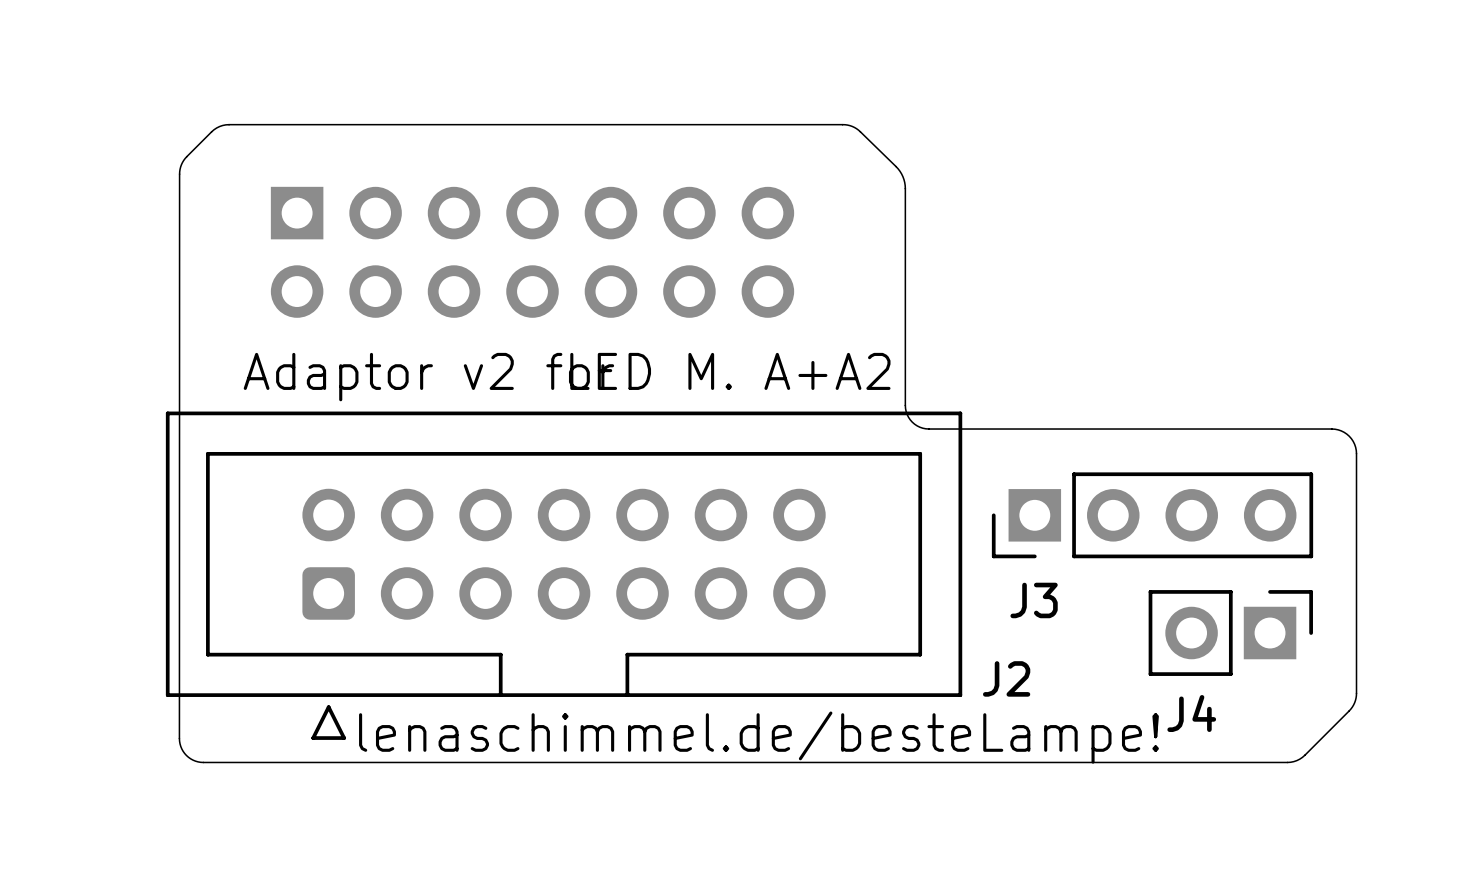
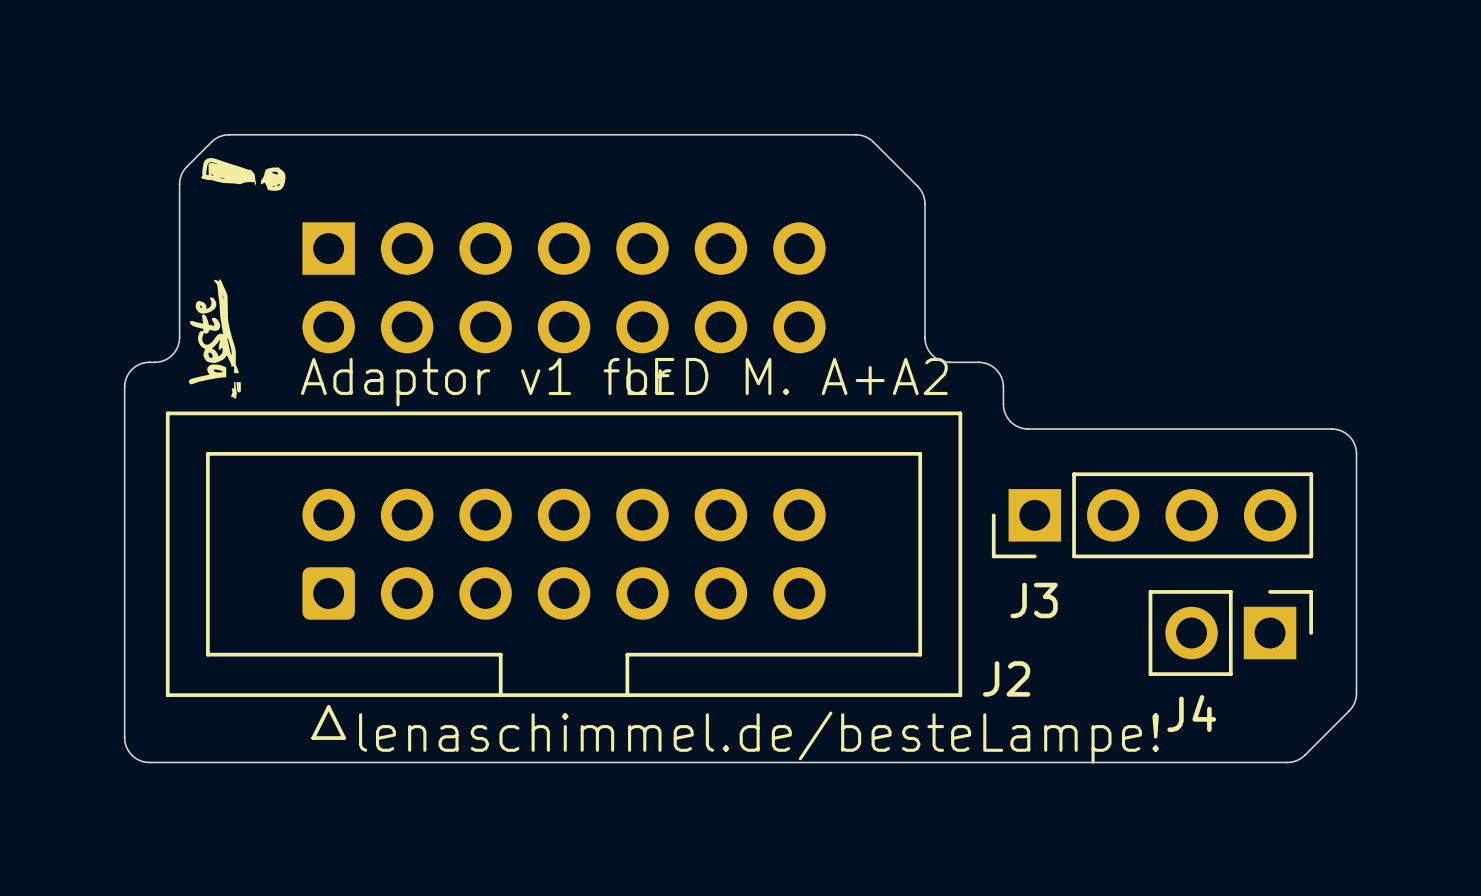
drawing: none -> [188, 158, 286, 399]
part position: (532, 252) -> (564, 287)
text position: LED M. A+A2 (730, 371) -> LED M. A+A2 (787, 376)
text: Adaptor v2 for (428, 377) -> Adaptor v1 for (486, 382)
board edge: (1028, 429) (925, 428) (917, 425) (908, 417) (905, 405) (904, 182) (896, 166) (860, 131) (852, 126) (842, 124) (229, 124) (219, 126) (211, 131) (185, 158) (179, 174) (179, 738) (181, 748) (186, 755) (192, 760) (203, 762) -> (1028, 429) (1015, 425) (1006, 416) (1003, 407) (1002, 380) (993, 367) (981, 362) (943, 361) (934, 357) (928, 349) (924, 337) (924, 197) (917, 186) (873, 142) (865, 136) (855, 134) (229, 134) (219, 136) (186, 166) (180, 179) (179, 337) (177, 347) (172, 355) (164, 360) (142, 363) (134, 367) (127, 374) (124, 387) (125, 744) (131, 755) (142, 761) (203, 762)

